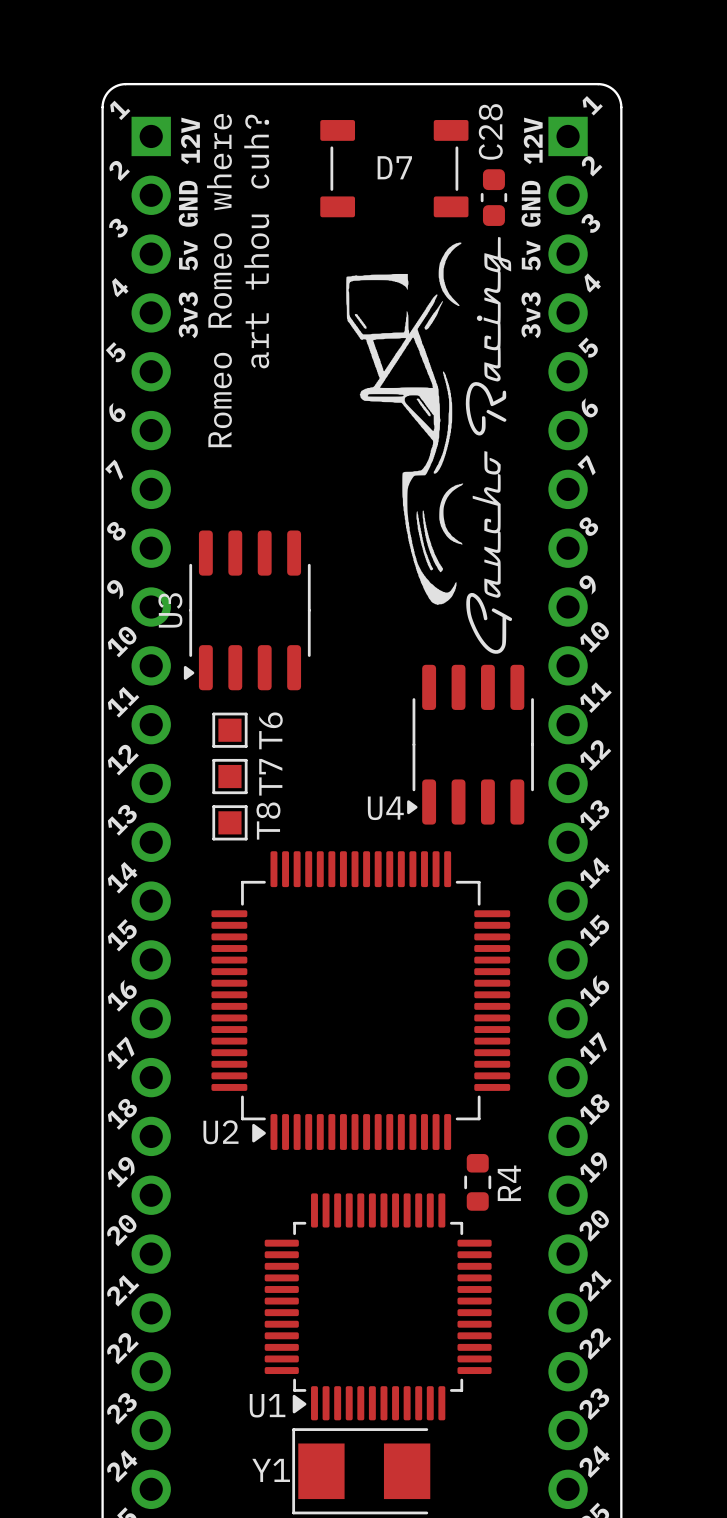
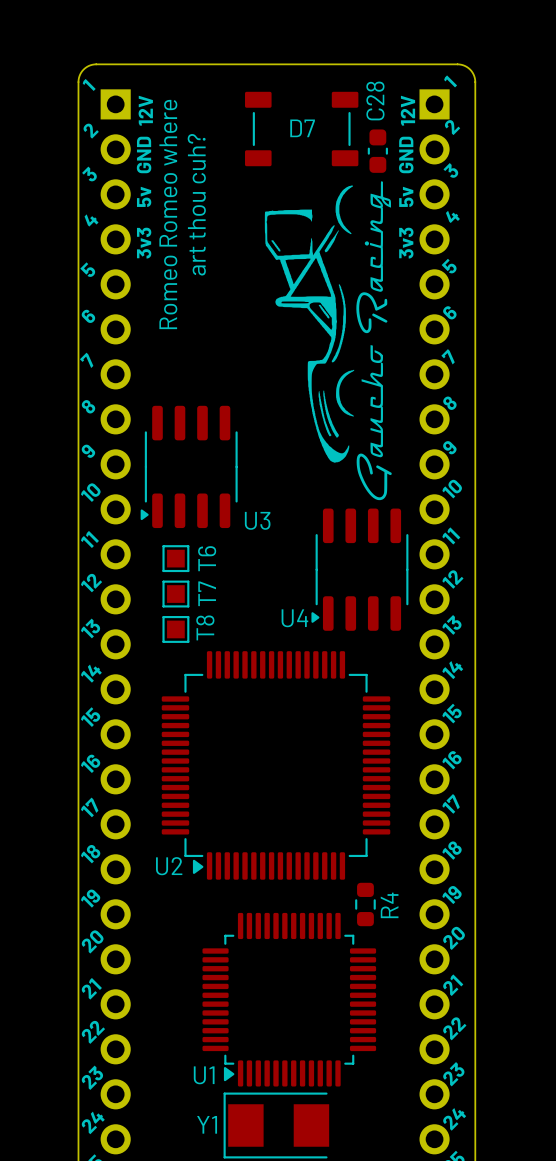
U3 name rotation: 0° (170, 610) -> 90° clockwise (257, 520)
U3 name position: U3 (170, 610) -> U3 (257, 520)

